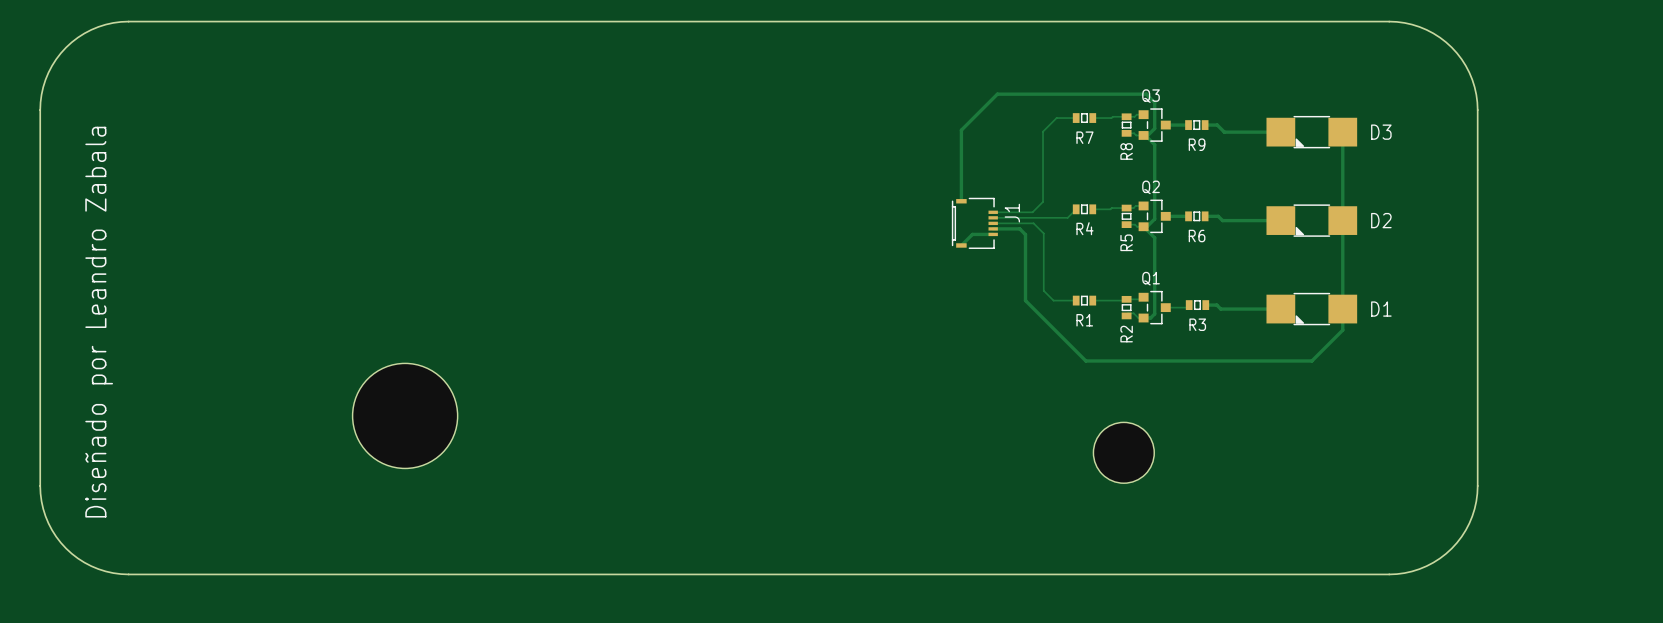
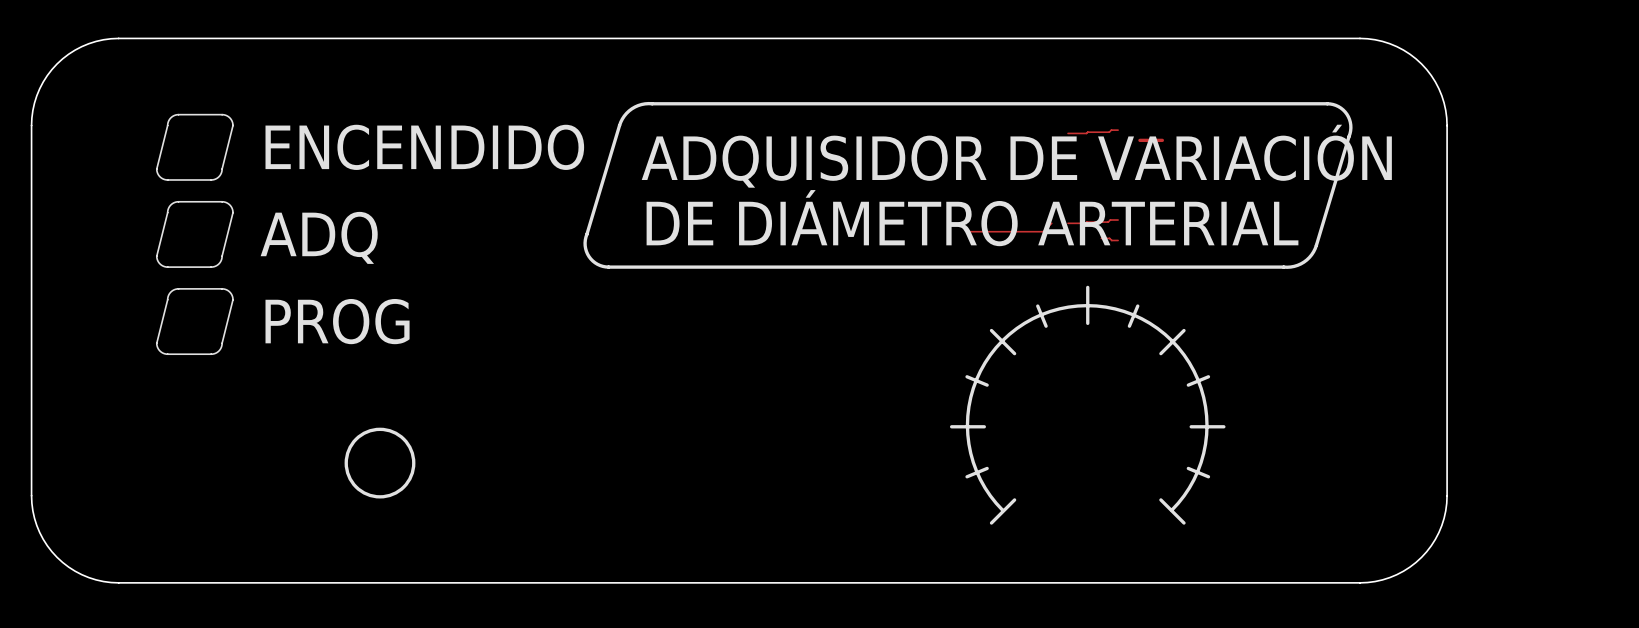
line: none -> (652, 103) (1327, 103) (1335, 105) (1343, 109) (1349, 119) (1350, 127) (1315, 248) (1306, 259) (1290, 267) (602, 266) (595, 262) (589, 256) (585, 248) (585, 240) (619, 125) (624, 116) (631, 108) (641, 104) (652, 103)
line: none -> (178, 114) (223, 114) (231, 120) (233, 125) (221, 171) (216, 178) (166, 179) (158, 174) (156, 169) (168, 121) (171, 116) (178, 114)
track: (1076, 118) (1056, 118) (1043, 131) (1043, 201) (1032, 212) (993, 212) -> none
R7: (1084, 118) -> none
R8: (1126, 125) -> none
Q3: (1154, 125) -> none
R9: (1196, 125) -> none
track: (1205, 125) (1217, 125) (1224, 132) (1280, 132) -> none
text: none -> ENCENDIDO (424, 147)
D3: (1311, 132) -> none
track: (1342, 132) (1342, 330) (1311, 360) (1085, 360) (1025, 300) (1025, 234) (1019, 228) (993, 228) -> none
track: (1126, 133) (1147, 135) (1154, 128) (1154, 102) (1146, 94) (997, 94) (961, 130) (961, 201) -> none
track: (1145, 135) (1154, 144) (1154, 219) (1146, 226) (1143, 226) (1154, 237) (1154, 313) (1150, 318) (1138, 318) (1133, 313) (1128, 313) (1126, 315) -> none
text: none -> ADQUISIDOR DE VARIACIÓN (1016, 156)
line: none -> (178, 201) (223, 201) (231, 207) (233, 212) (221, 259) (216, 265) (166, 267) (158, 261) (156, 256) (168, 208) (171, 204) (178, 201)
text: none -> DE DIÁMETRO ARTERIAL (972, 218)
R4: (1084, 209) -> none
R5: (1126, 216) -> none
Q2: (1154, 216) -> none
track: (1165, 216) (1188, 216) -> none
R6: (1196, 216) -> none
track: (1205, 216) (1218, 216) (1222, 220) (1280, 220) -> none
D2: (1311, 220) -> none
text: none -> ADQ (319, 237)
J1: (974, 223) -> none
track: (993, 223) (1033, 223) (1043, 233) (1043, 290) (1053, 300) (1076, 300) -> none
track: (993, 234) (972, 234) (961, 245) -> none
line: none -> (1087, 287) (1087, 323)
line: none -> (178, 288) (223, 288) (231, 294) (233, 299) (221, 346) (216, 352) (166, 354) (158, 348) (156, 343) (168, 295) (171, 291) (178, 288)
line: none -> (1037, 306) (1046, 326)
line: none -> (1137, 306) (1129, 326)
track: (1143, 297) (1141, 299) (1125, 300) (1092, 300) -> none
R1: (1084, 300) -> none
track: (1189, 305) (1186, 307) (1165, 307) -> none
R3: (1197, 305) -> none
track: (1205, 305) (1216, 305) (1220, 309) (1280, 309) -> none
R2: (1126, 307) -> none
Q1: (1154, 307) -> none
text: none -> PROG (337, 321)
D1: (1311, 309) -> none
line: none -> (991, 330) (1014, 353)
line: none -> (1184, 330) (1160, 353)
text: Diseñado por Leandro Zabala (99, 322) -> none
line: none -> (967, 376) (987, 385)
line: none -> (1208, 376) (1188, 385)
hole: (405, 415) -> none
line: none -> (951, 426) (984, 426)
line: none -> (1191, 426) (1223, 426)
drawing: none -> [344, 427, 416, 499]
hole: (1123, 452) -> none
line: none -> (987, 468) (967, 476)
line: none -> (1188, 468) (1208, 476)
line: none -> (1014, 499) (991, 523)
line: none -> (1160, 499) (1184, 523)
line: none -> (1002, 510) (980, 479) (968, 444) (968, 406) (976, 379) (996, 347) (1016, 328) (1050, 311) (1087, 305) (1124, 311) (1157, 328) (1178, 347) (1197, 379) (1205, 406) (1205, 444) (1193, 479) (1171, 510)

